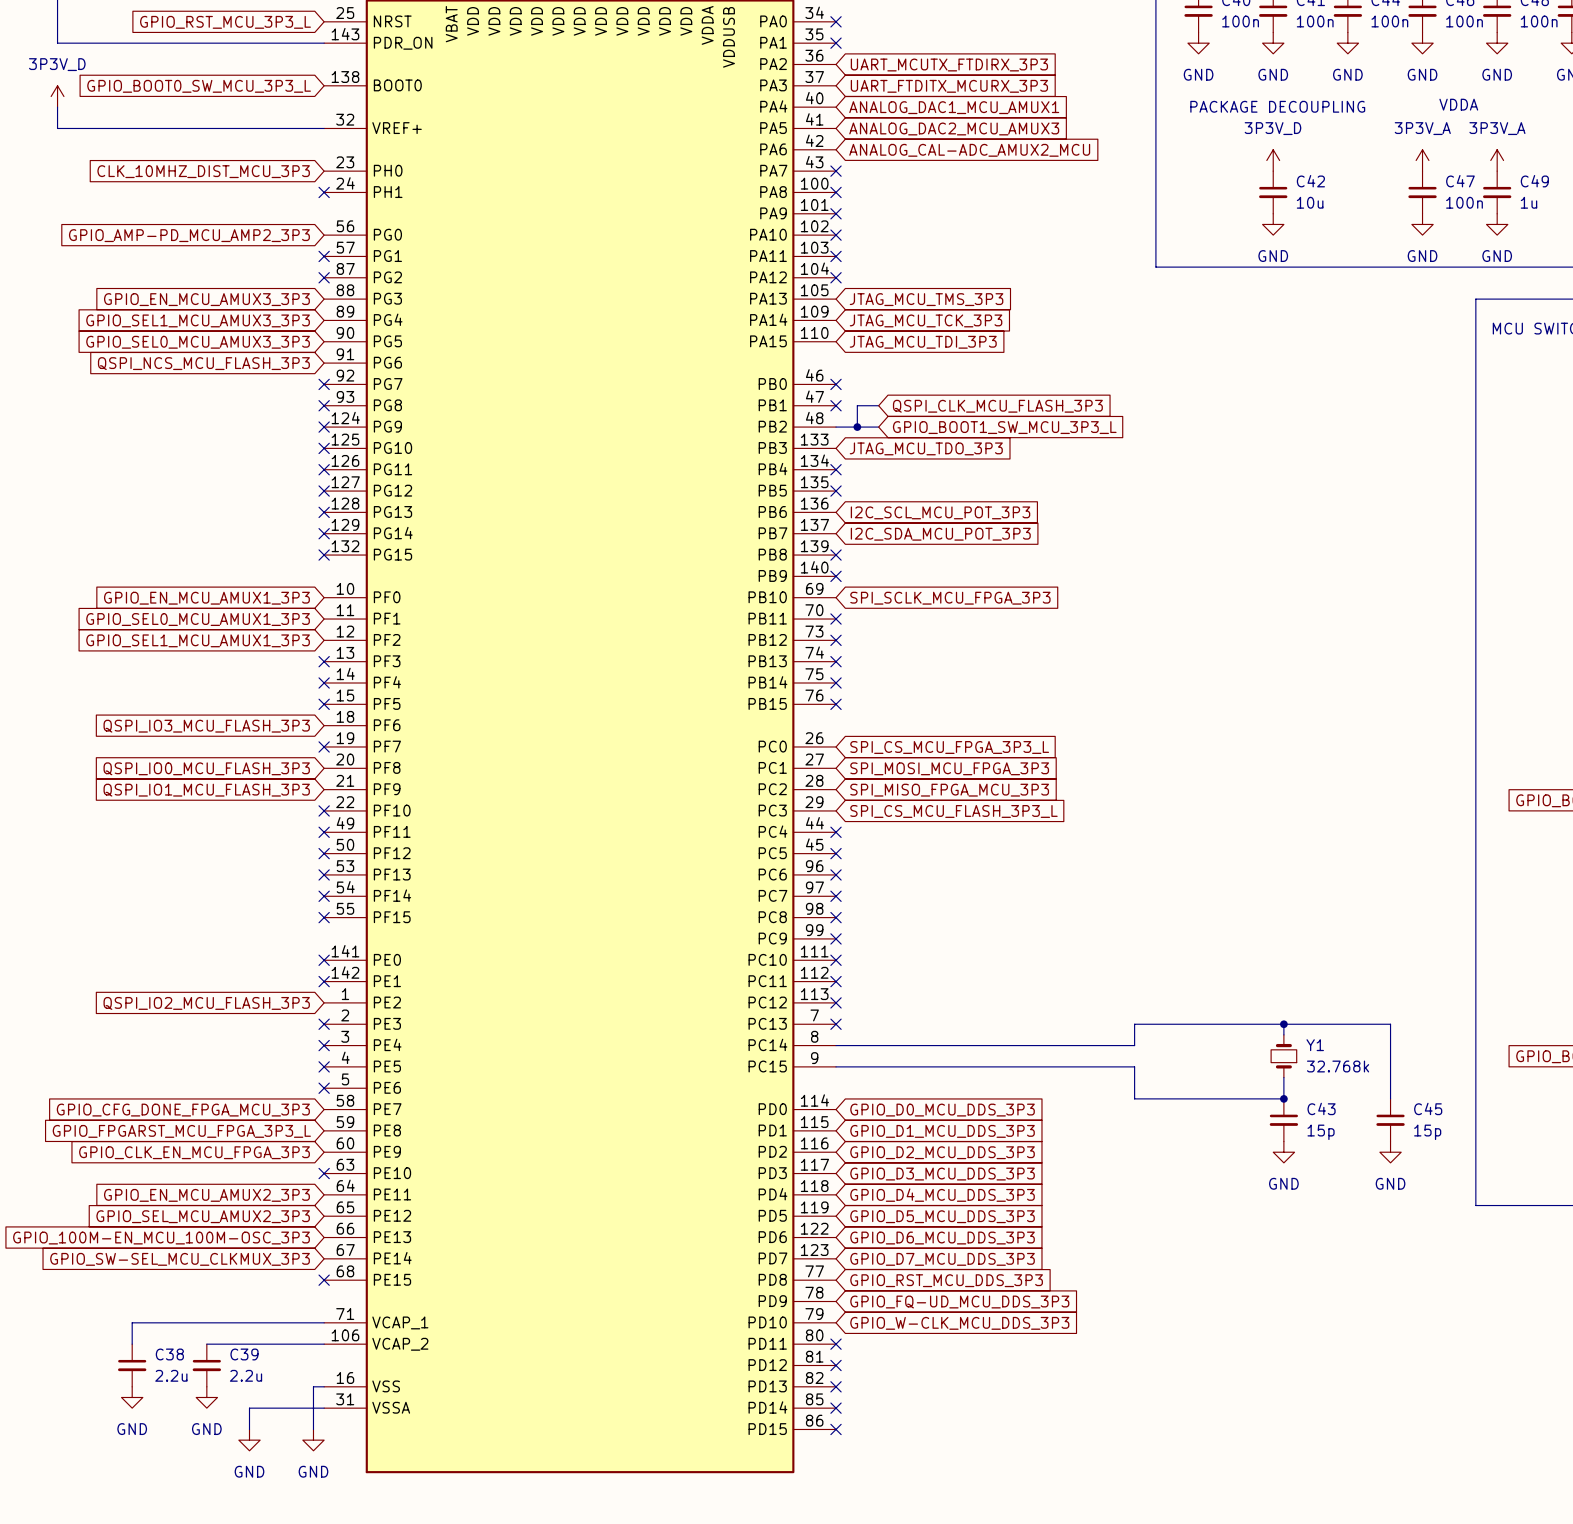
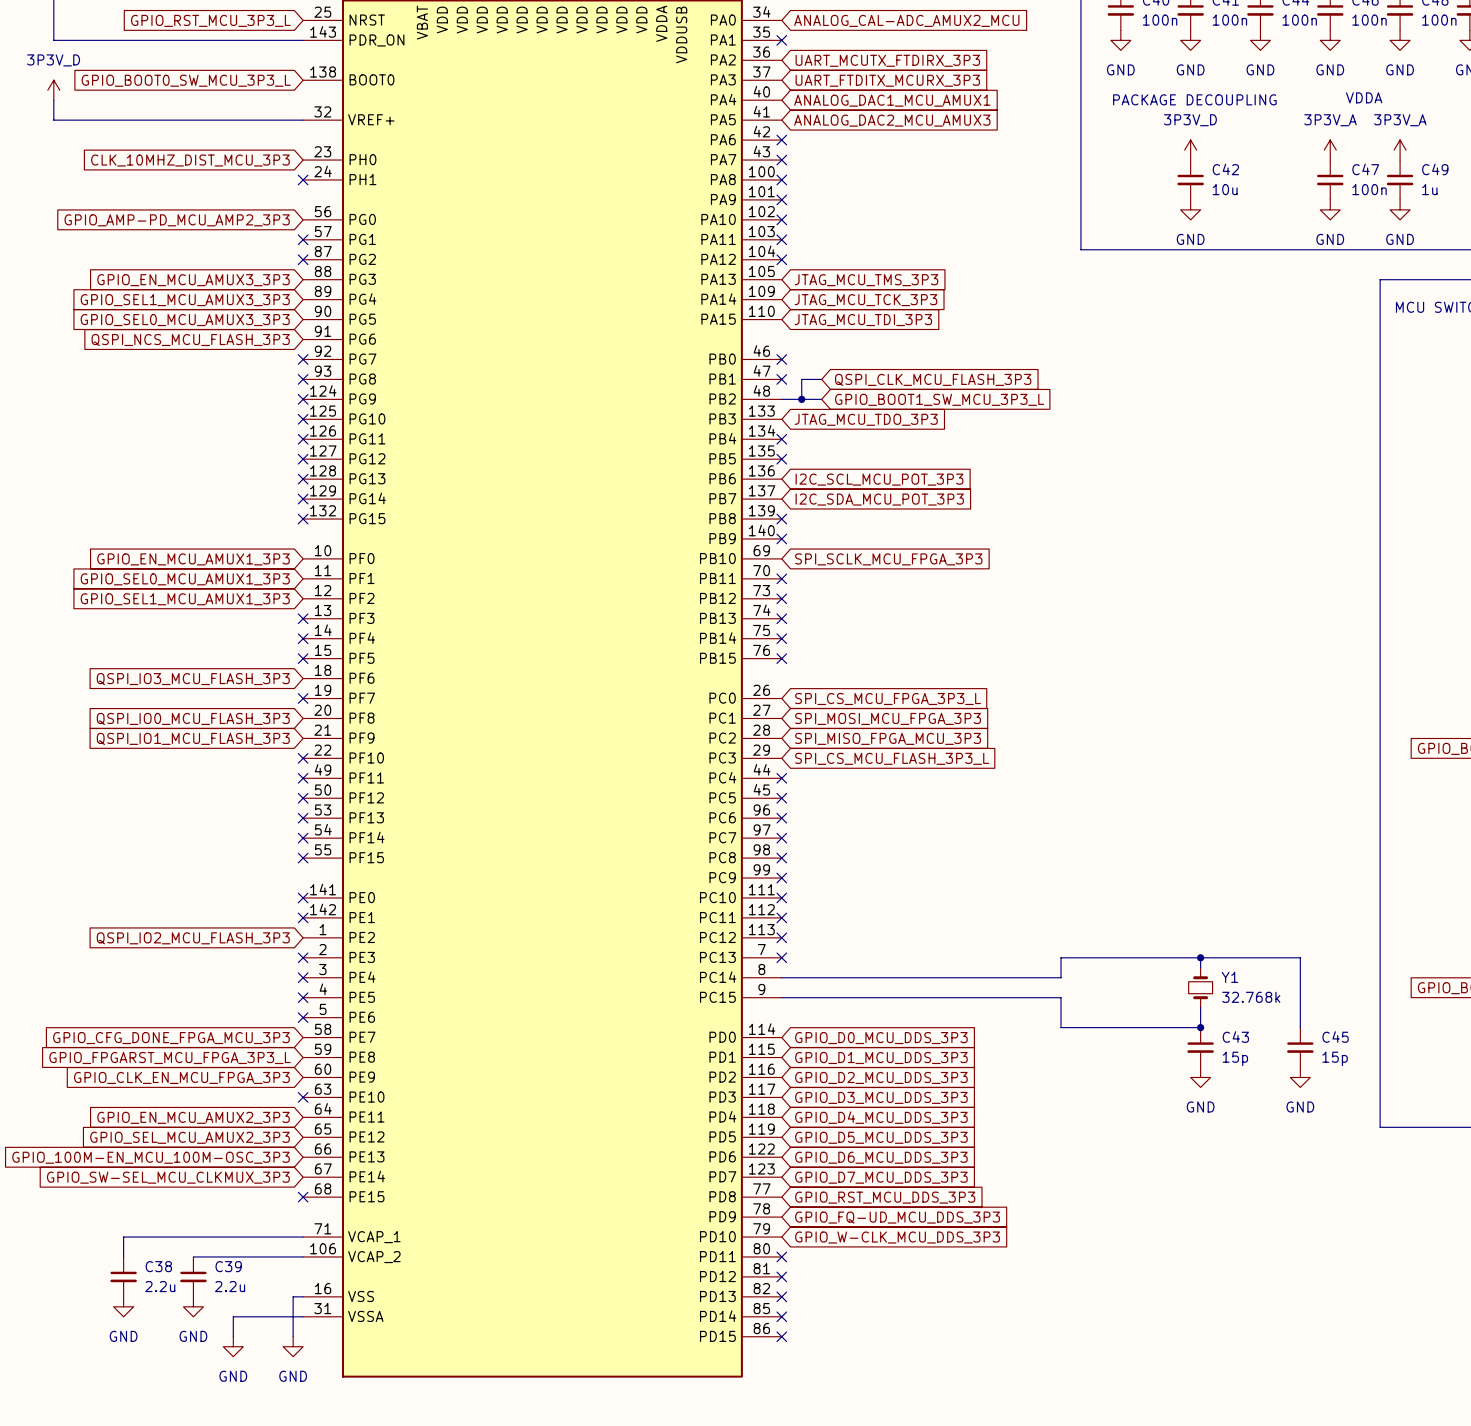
no-connect mark: (836, 21) -> none
no-connect mark: none -> (781, 140)
global label position: ANALOG_CAL-ADC_AMUX2_MCU (969, 150) -> ANALOG_CAL-ADC_AMUX2_MCU (906, 20)

